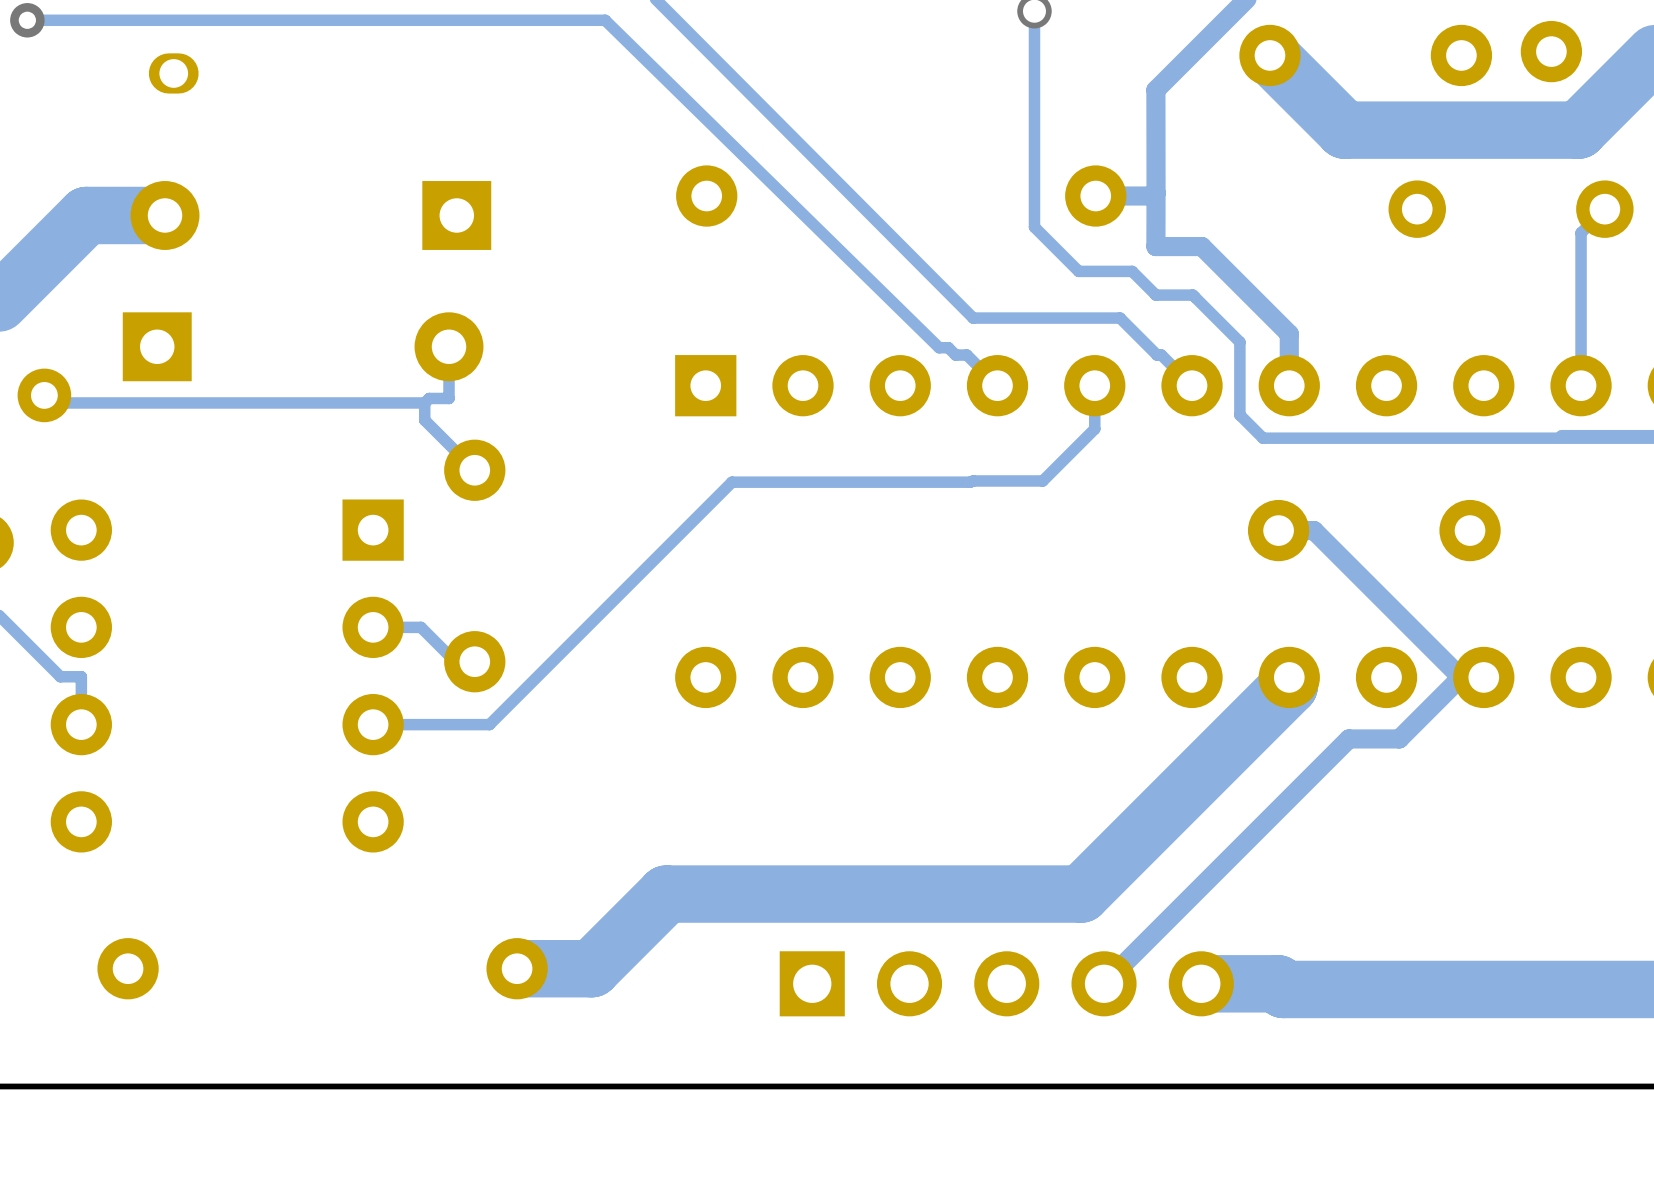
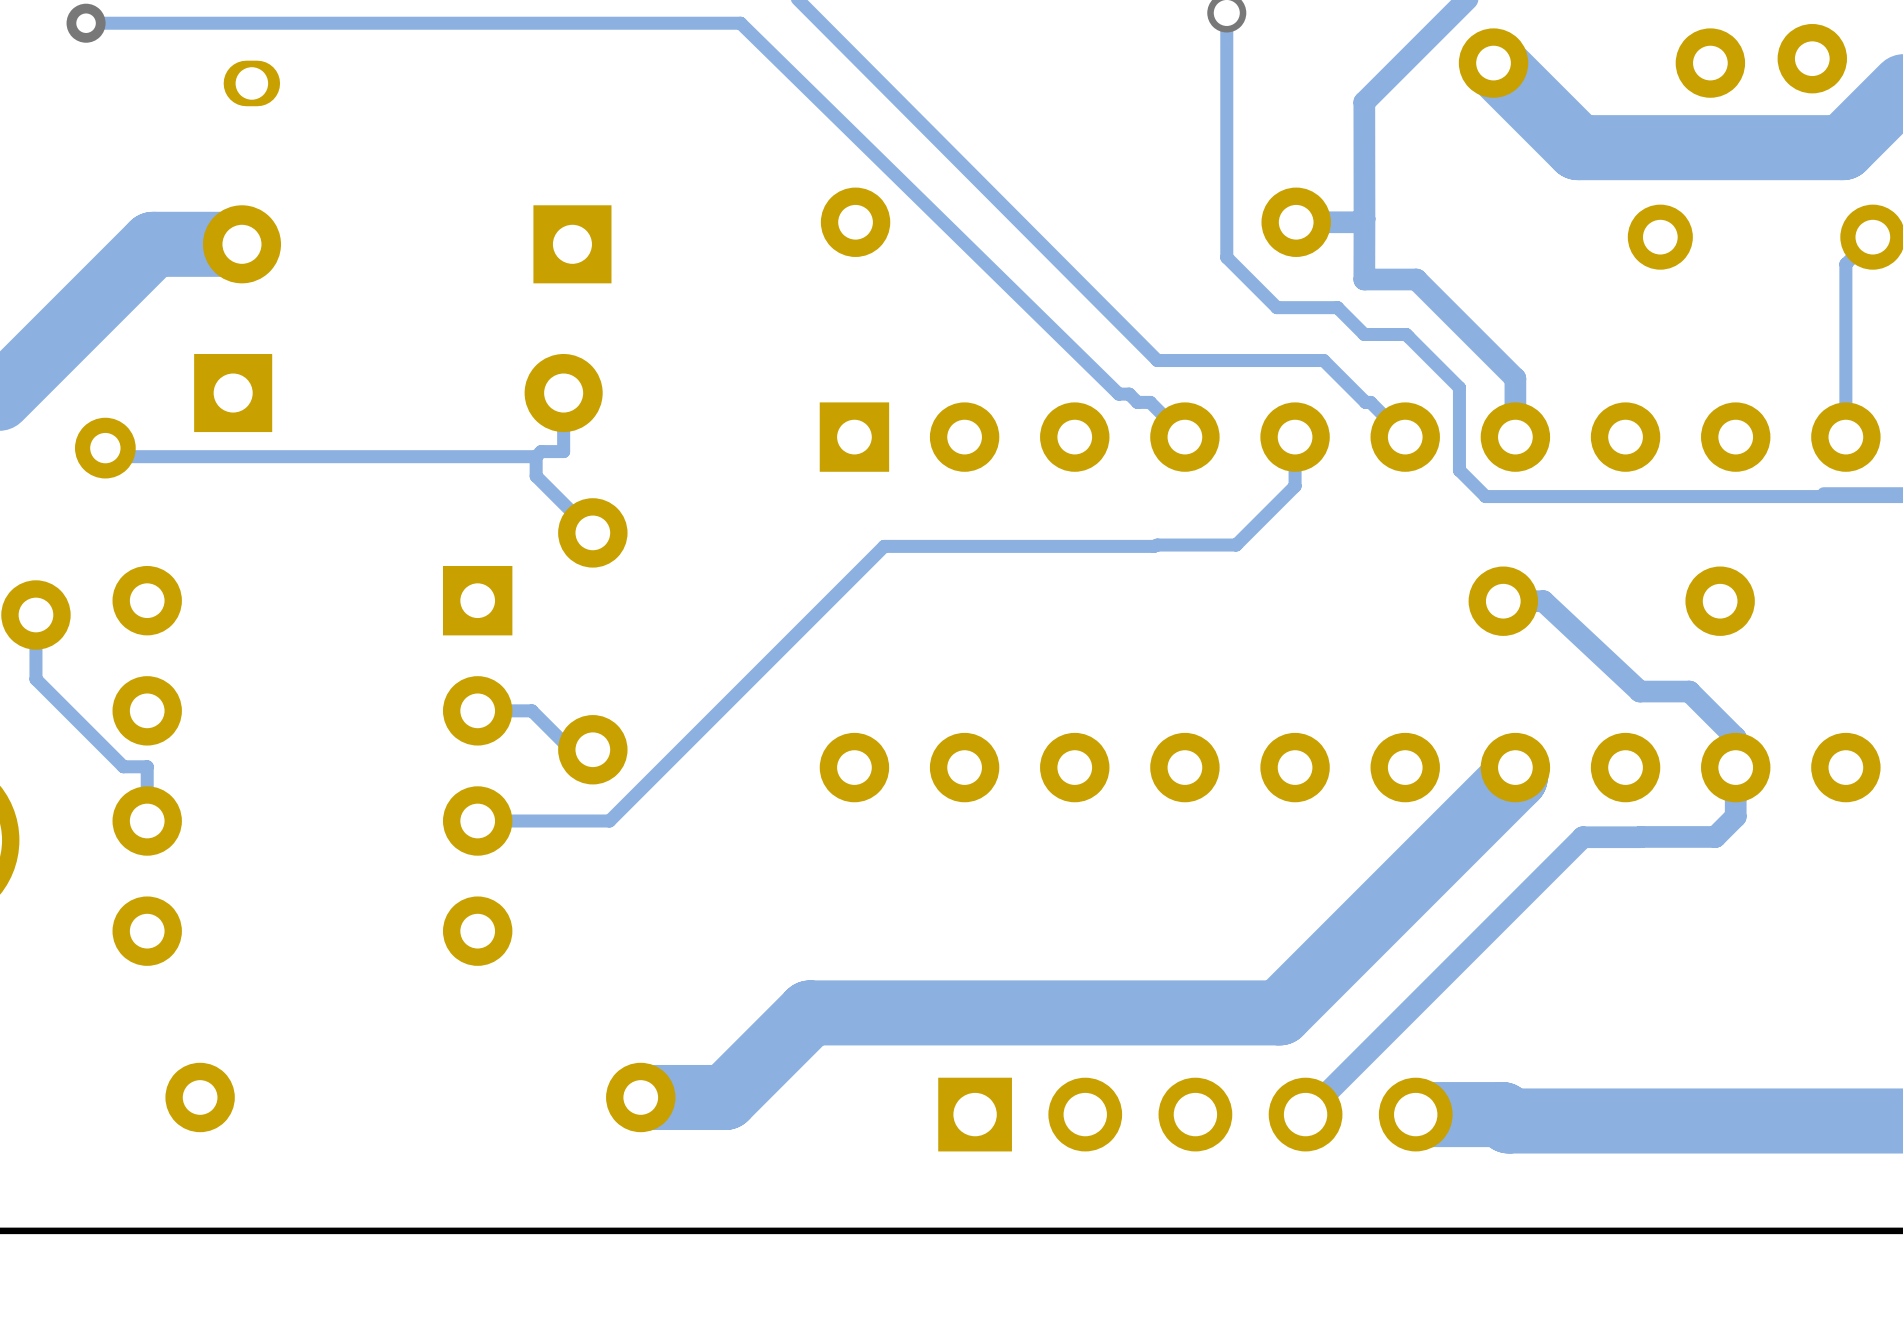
track: (1314, 530) (1460, 677) -> (1543, 601) (1639, 691) (1689, 691) (1735, 737) (1735, 816) (1715, 836) (1640, 837)
track: (1460, 677) (1399, 738) -> none

